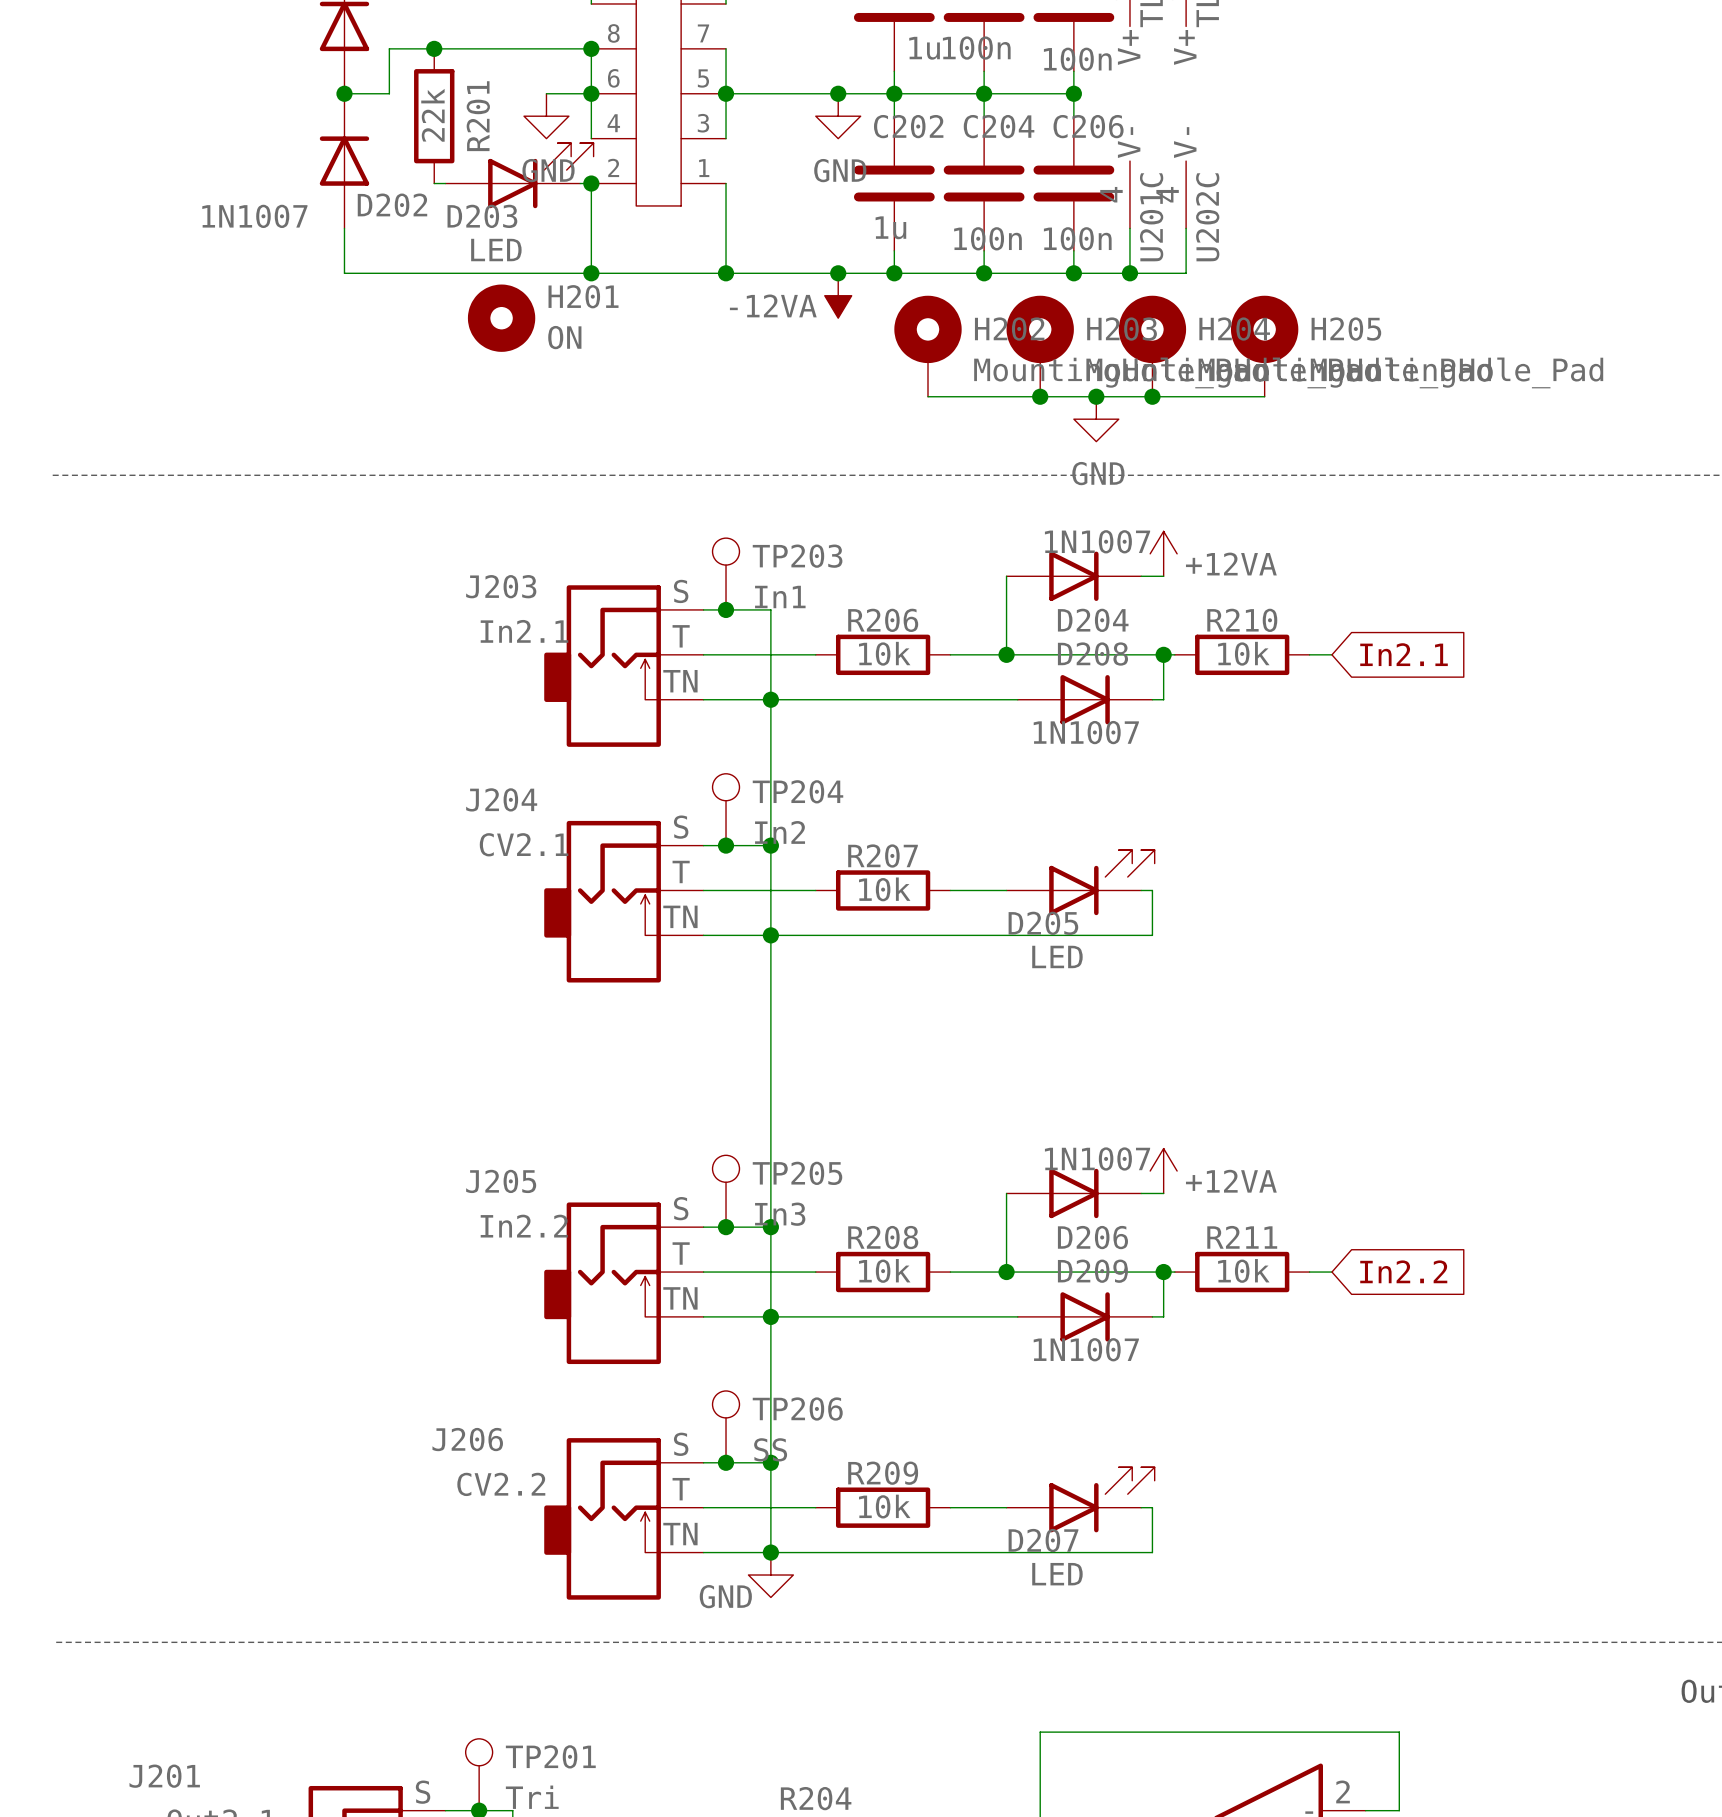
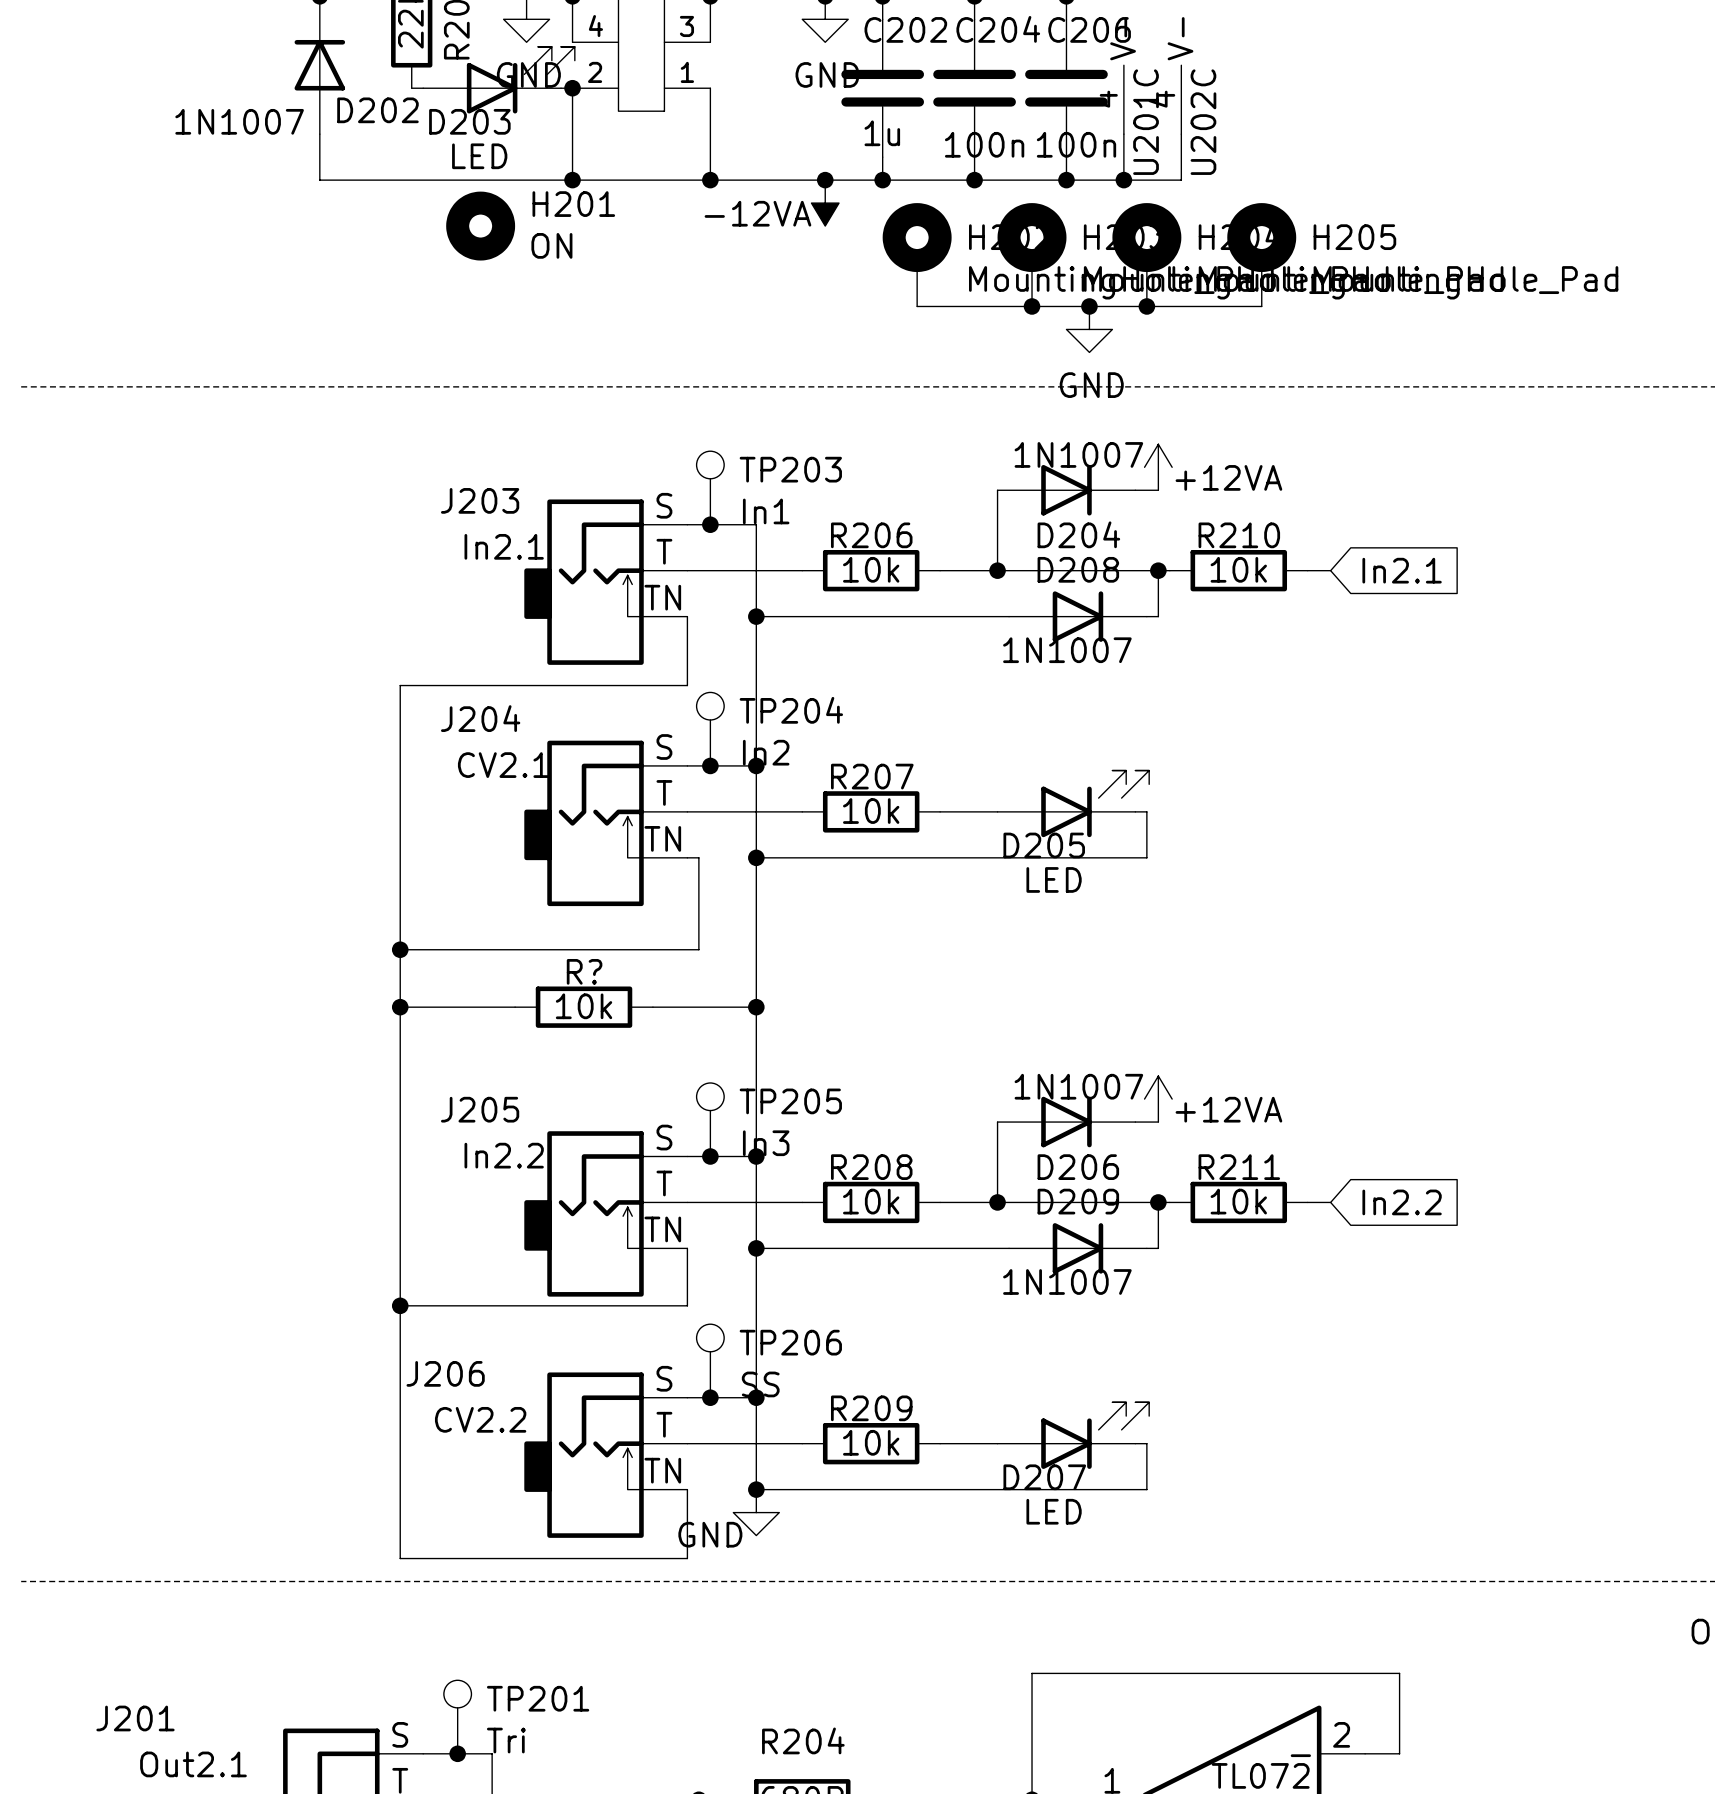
wire: (703, 699) (770, 699) -> (687, 616) (687, 685) (400, 685) (400, 1558) (687, 1558) (687, 1489)
wire: (714, 935) (770, 935) -> (698, 857) (698, 949) (400, 949)
junction: none -> (400, 949)
wire: none -> (400, 1007) (515, 1007)
junction: none -> (400, 1007)
R?: none -> 10k (584, 1007)
wire: none -> (652, 1007) (756, 1007)
junction: none -> (756, 1007)
wire: (703, 1316) (770, 1316) -> (687, 1248) (687, 1305) (400, 1305)
junction: none -> (400, 1305)
wire: (703, 1552) (770, 1552) -> none

